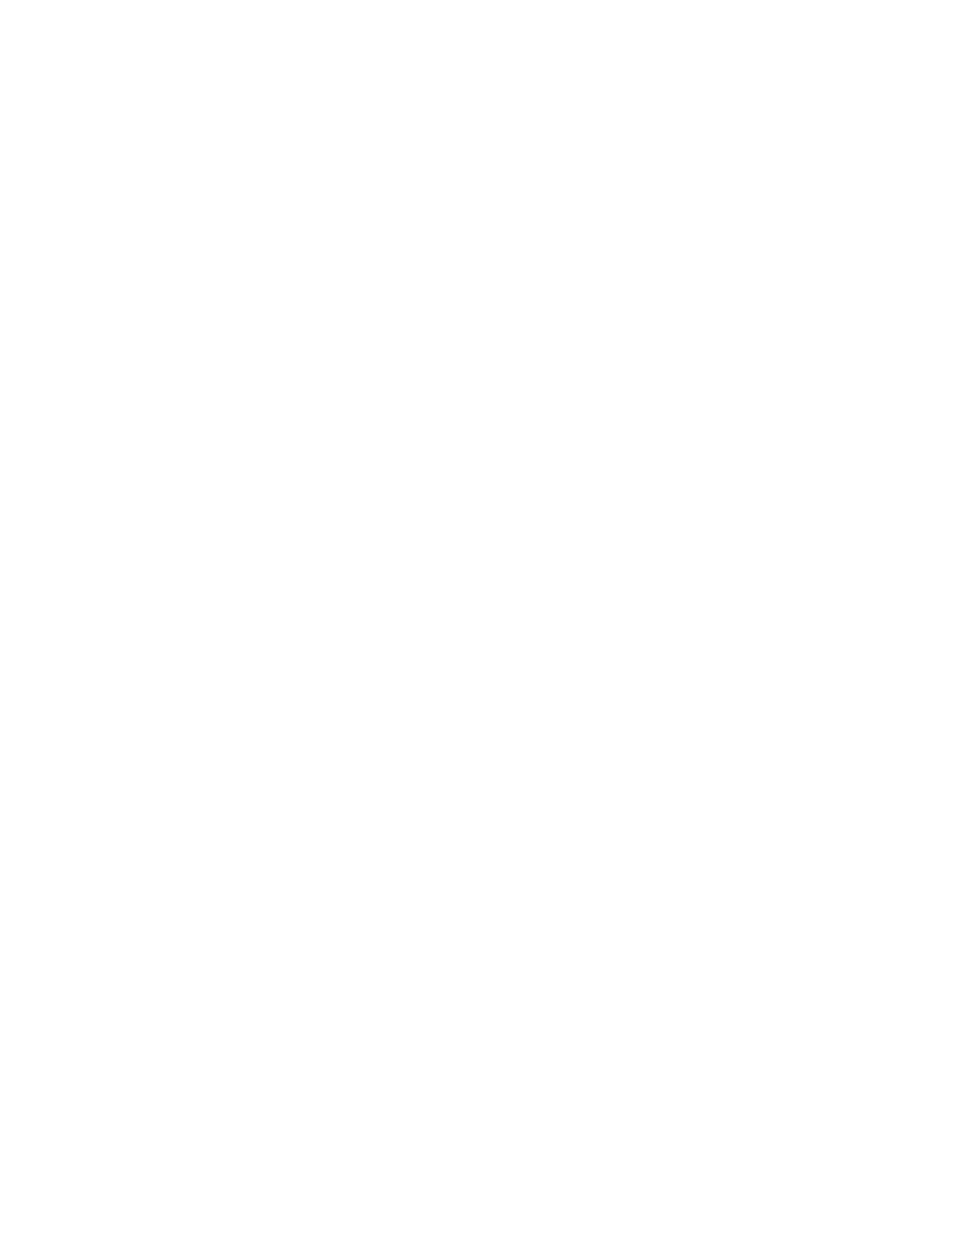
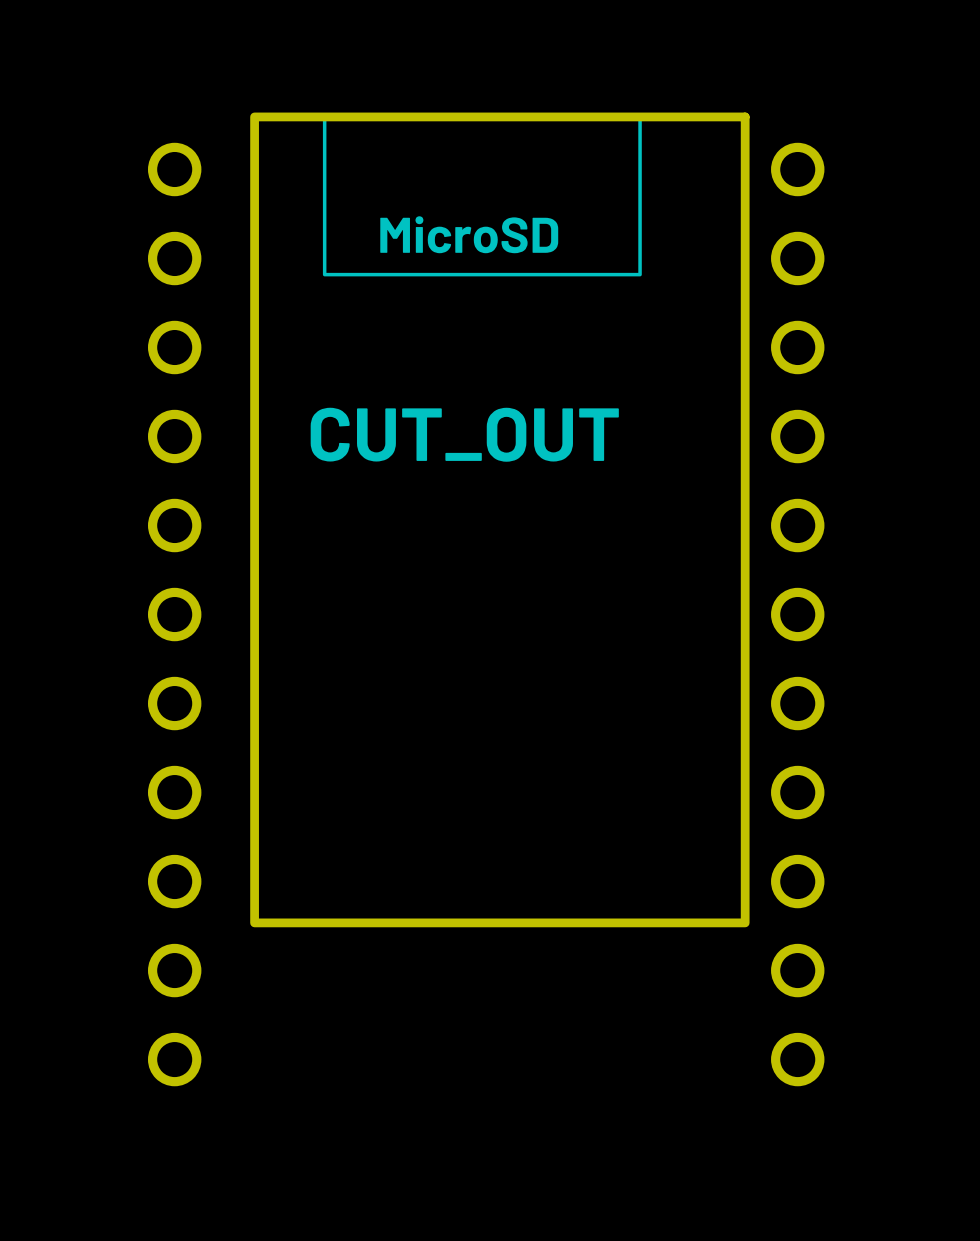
part: none -> (486, 599)

